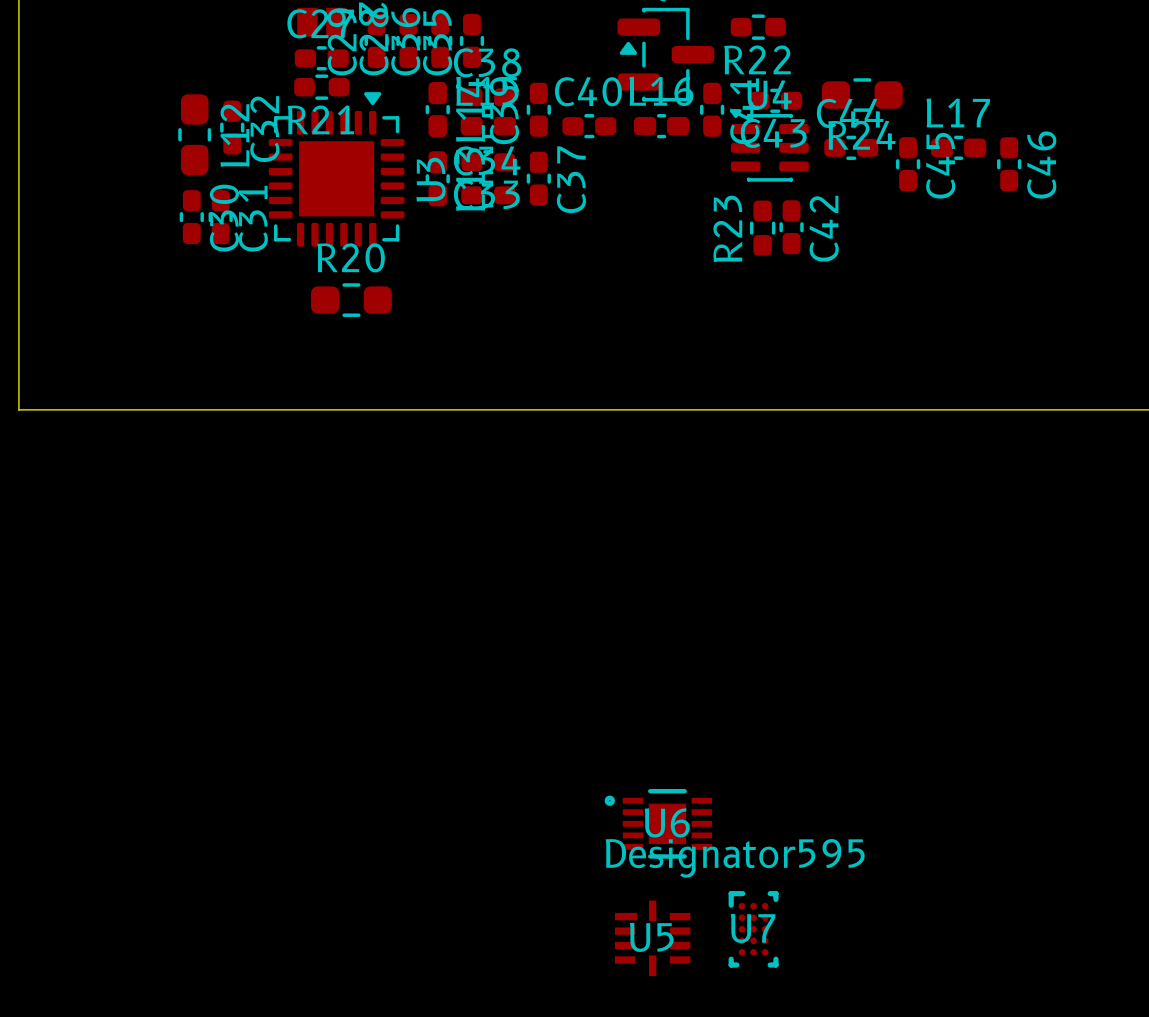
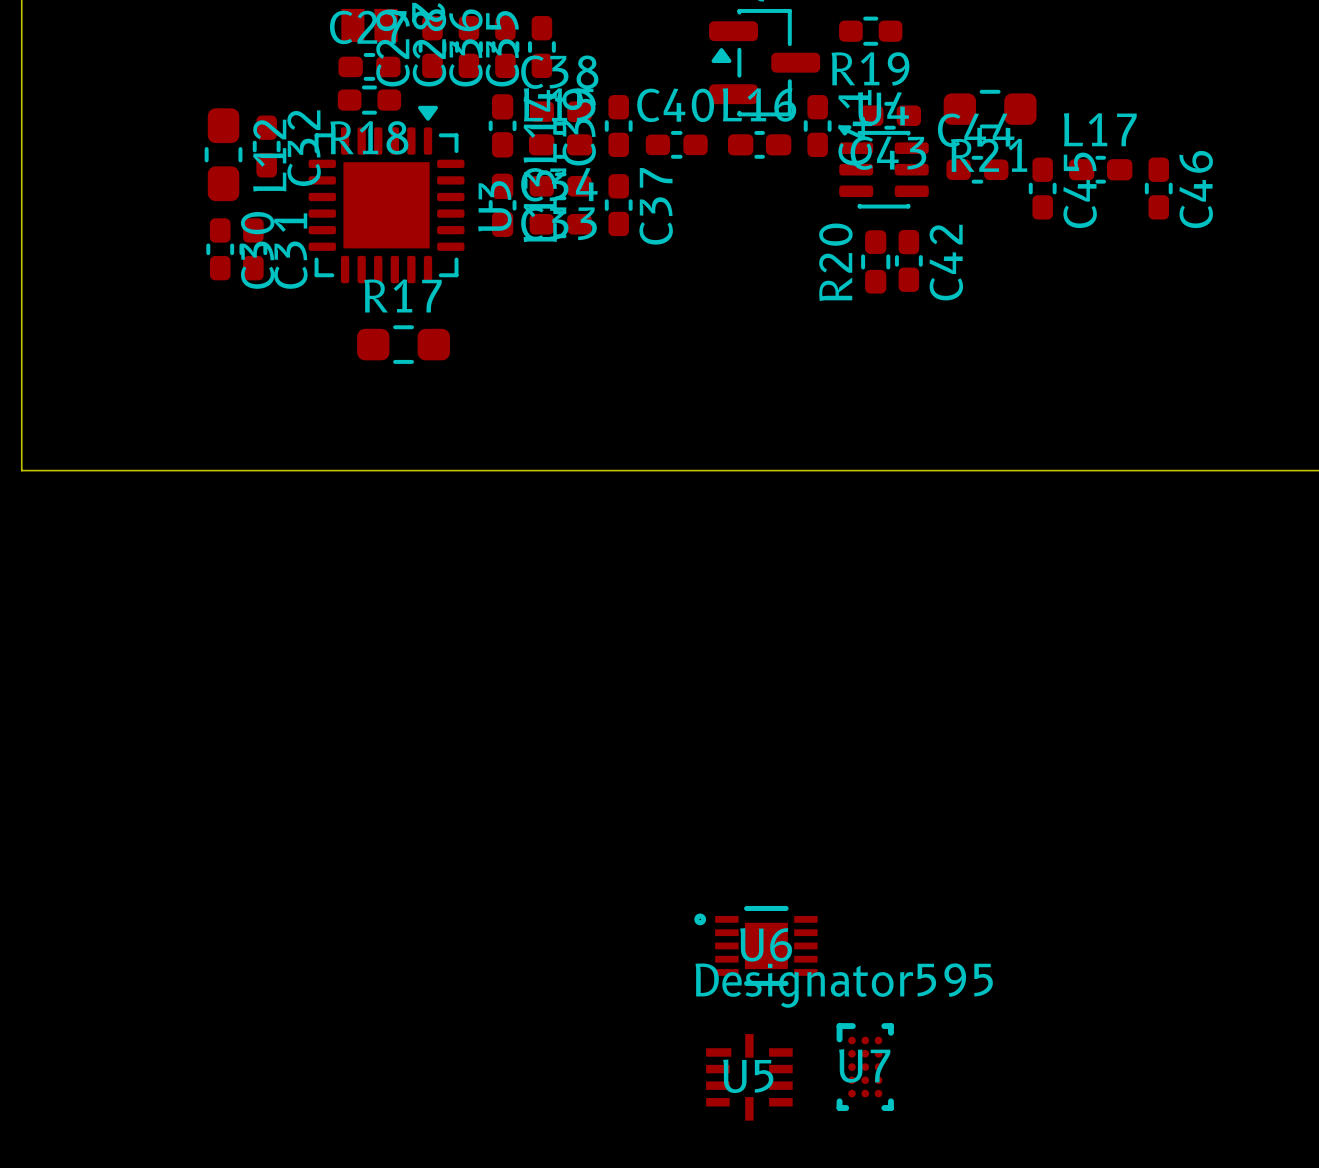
R22 name: R22 (757, 59) -> R19 (870, 68)
R21 name: R21 (320, 119) -> R18 (369, 137)
R24 name: R24 (861, 135) -> R21 (989, 155)
R23 name: R23 (727, 228) -> R20 (835, 262)
R20 name: R20 (351, 257) -> R17 (403, 295)

